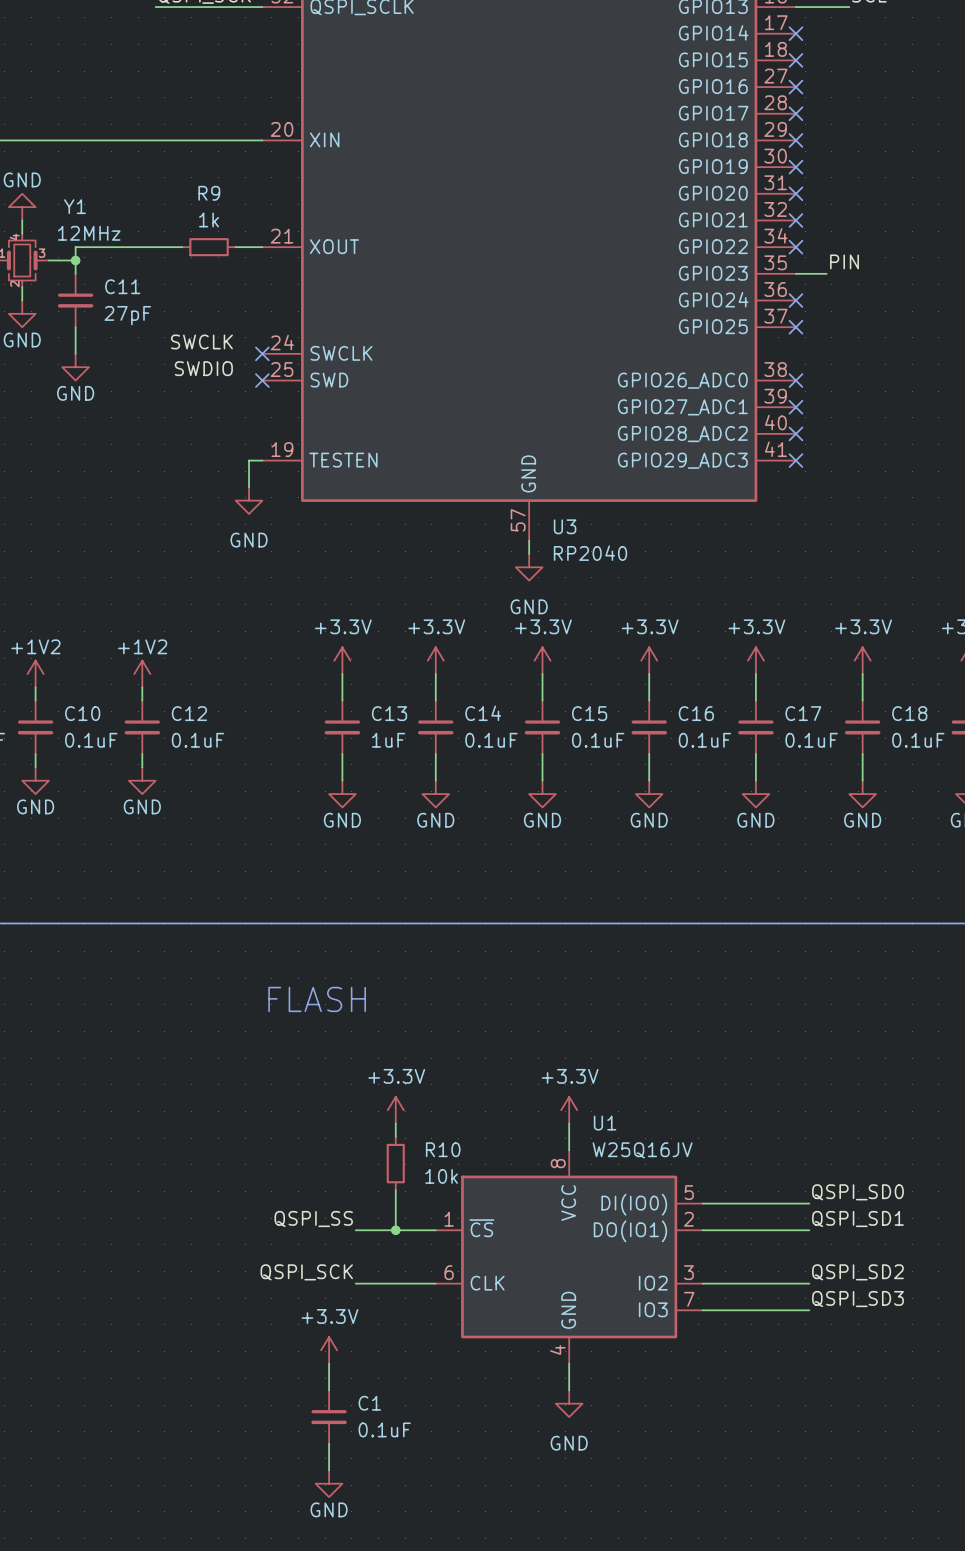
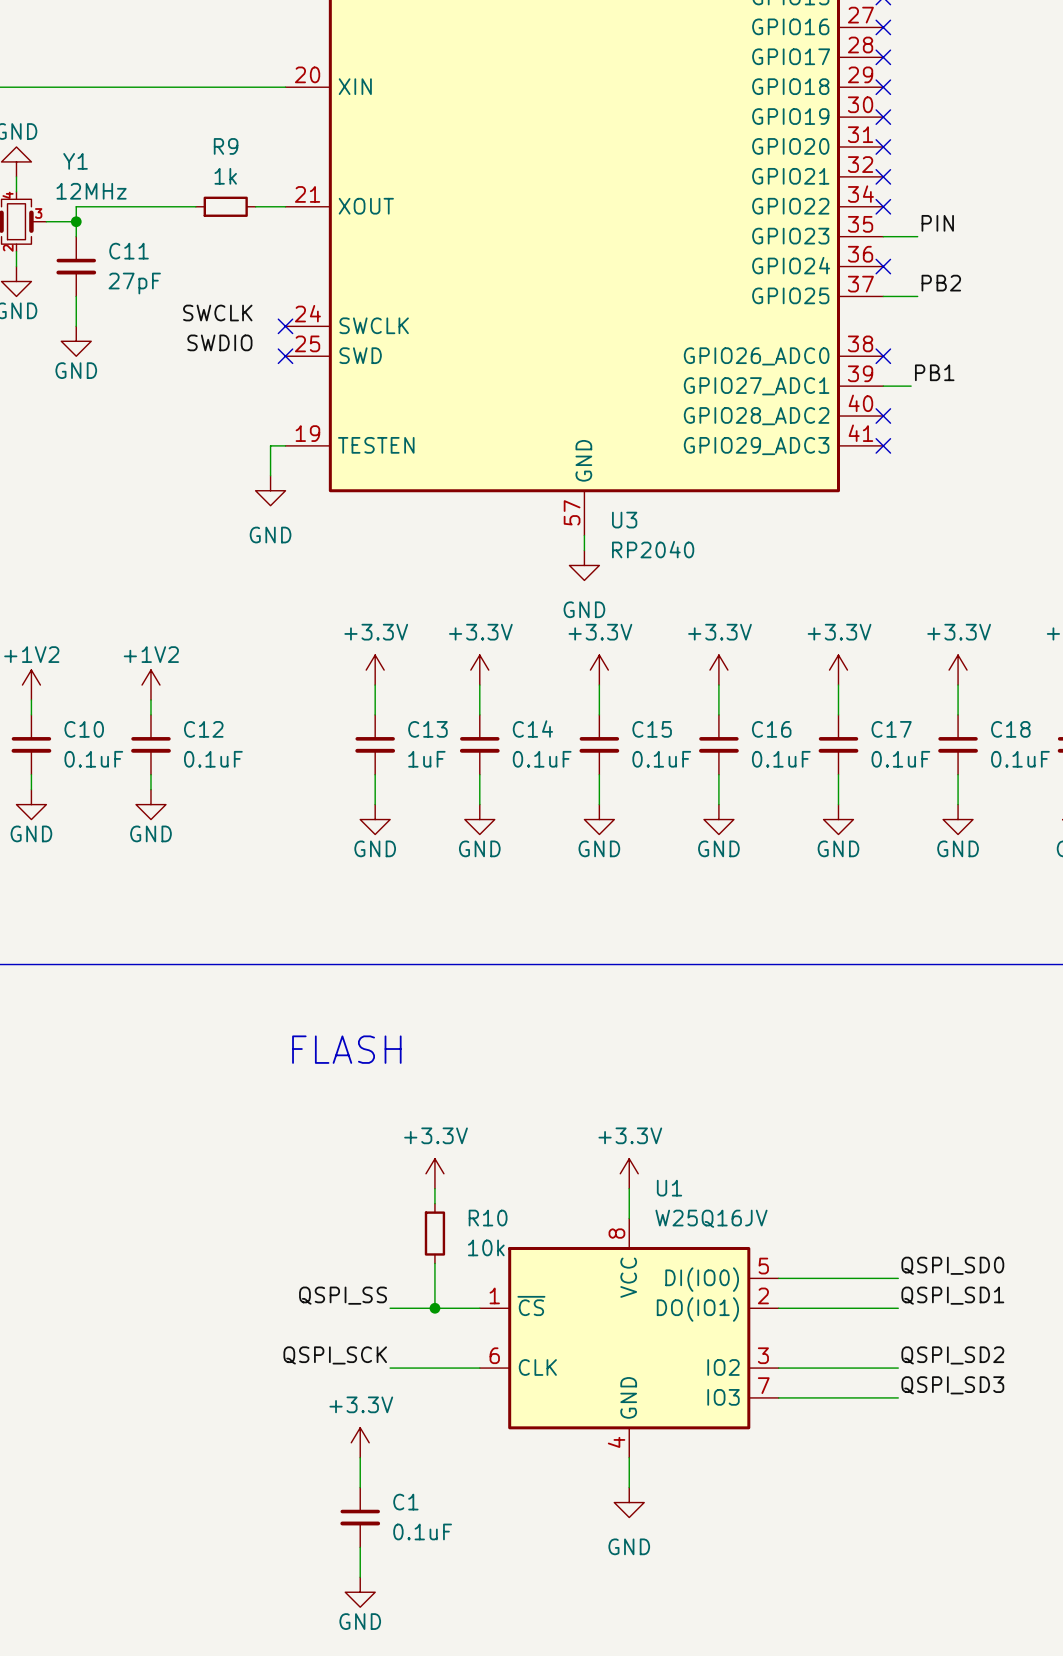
label: none -> PB2 (941, 283)
wire: none -> (883, 296) (917, 296)
no-connect mark: (795, 327) -> none
label: none -> PB1 (934, 372)
wire: none -> (883, 386) (911, 386)
no-connect mark: (795, 407) -> none

